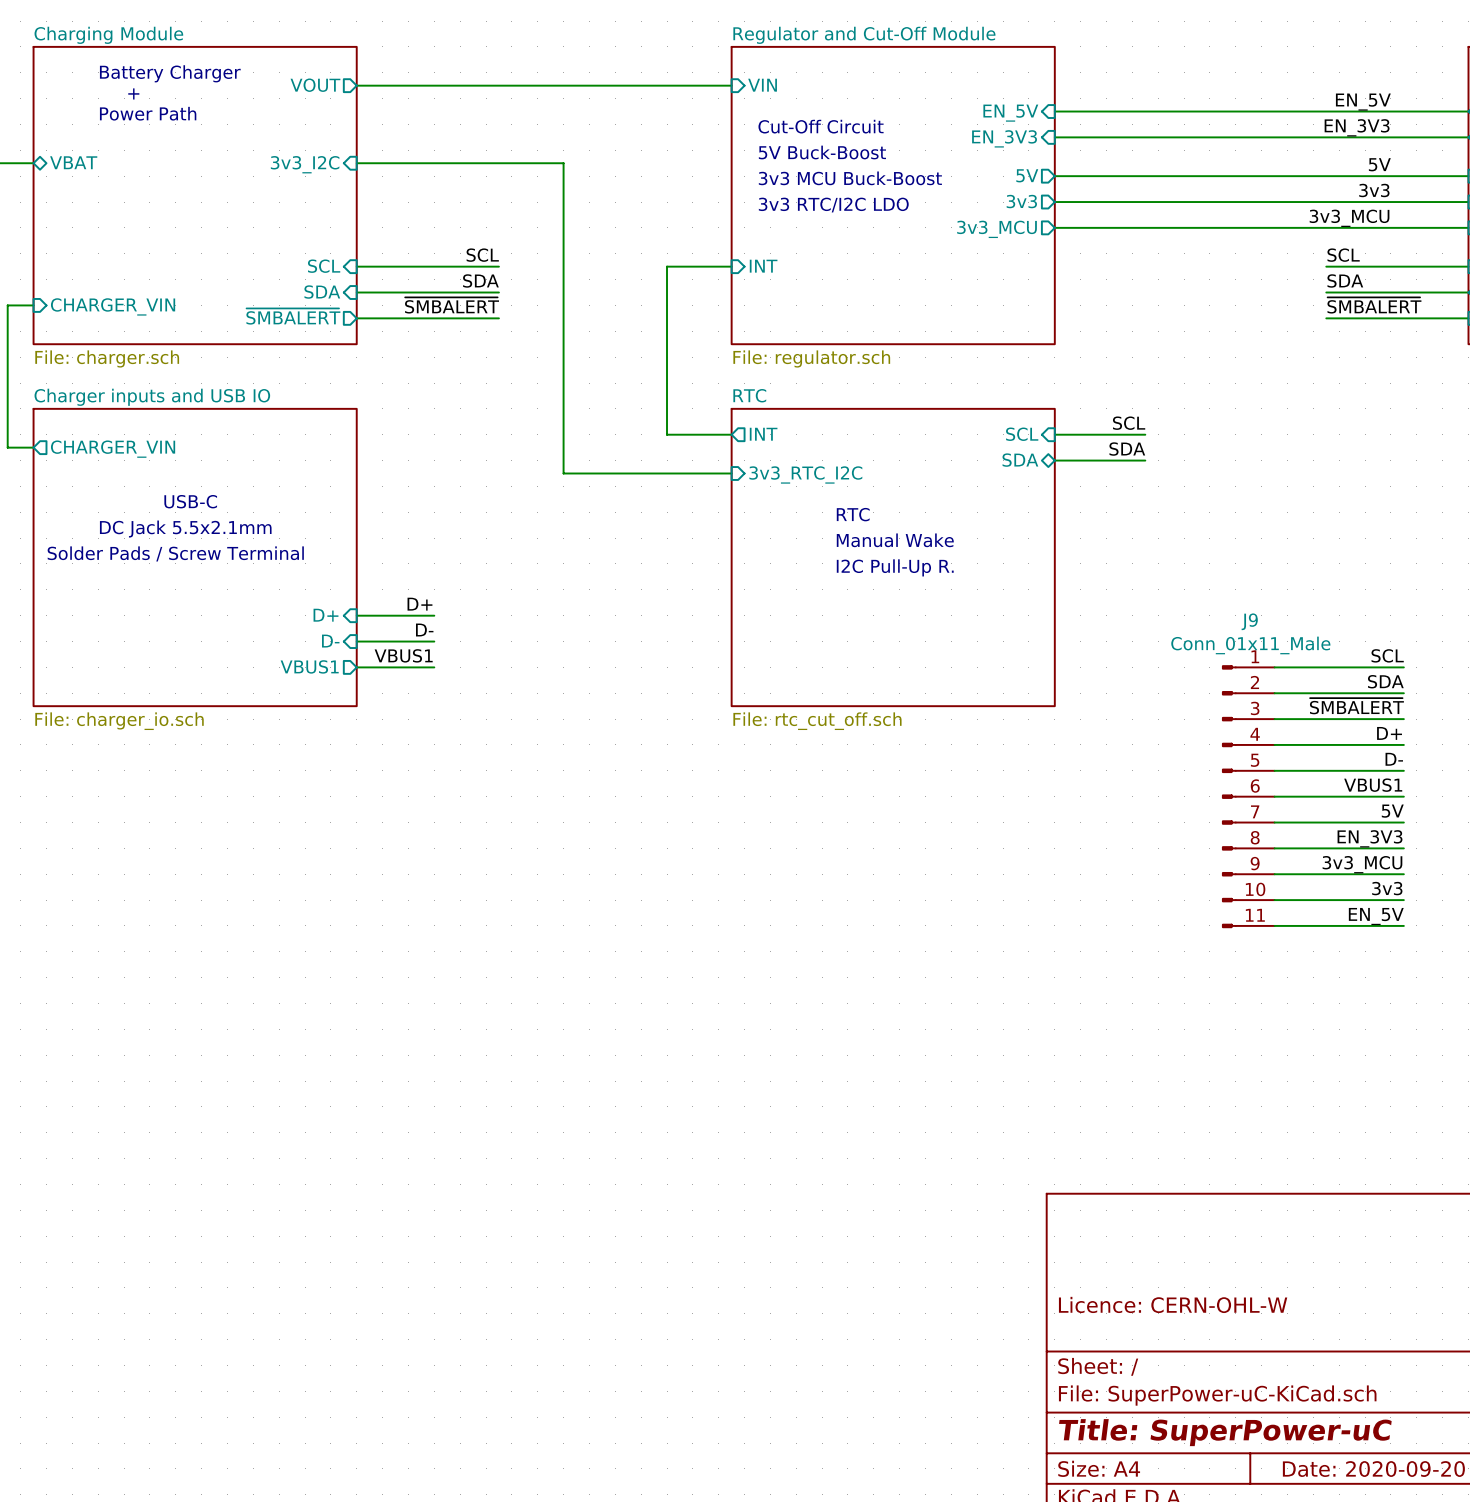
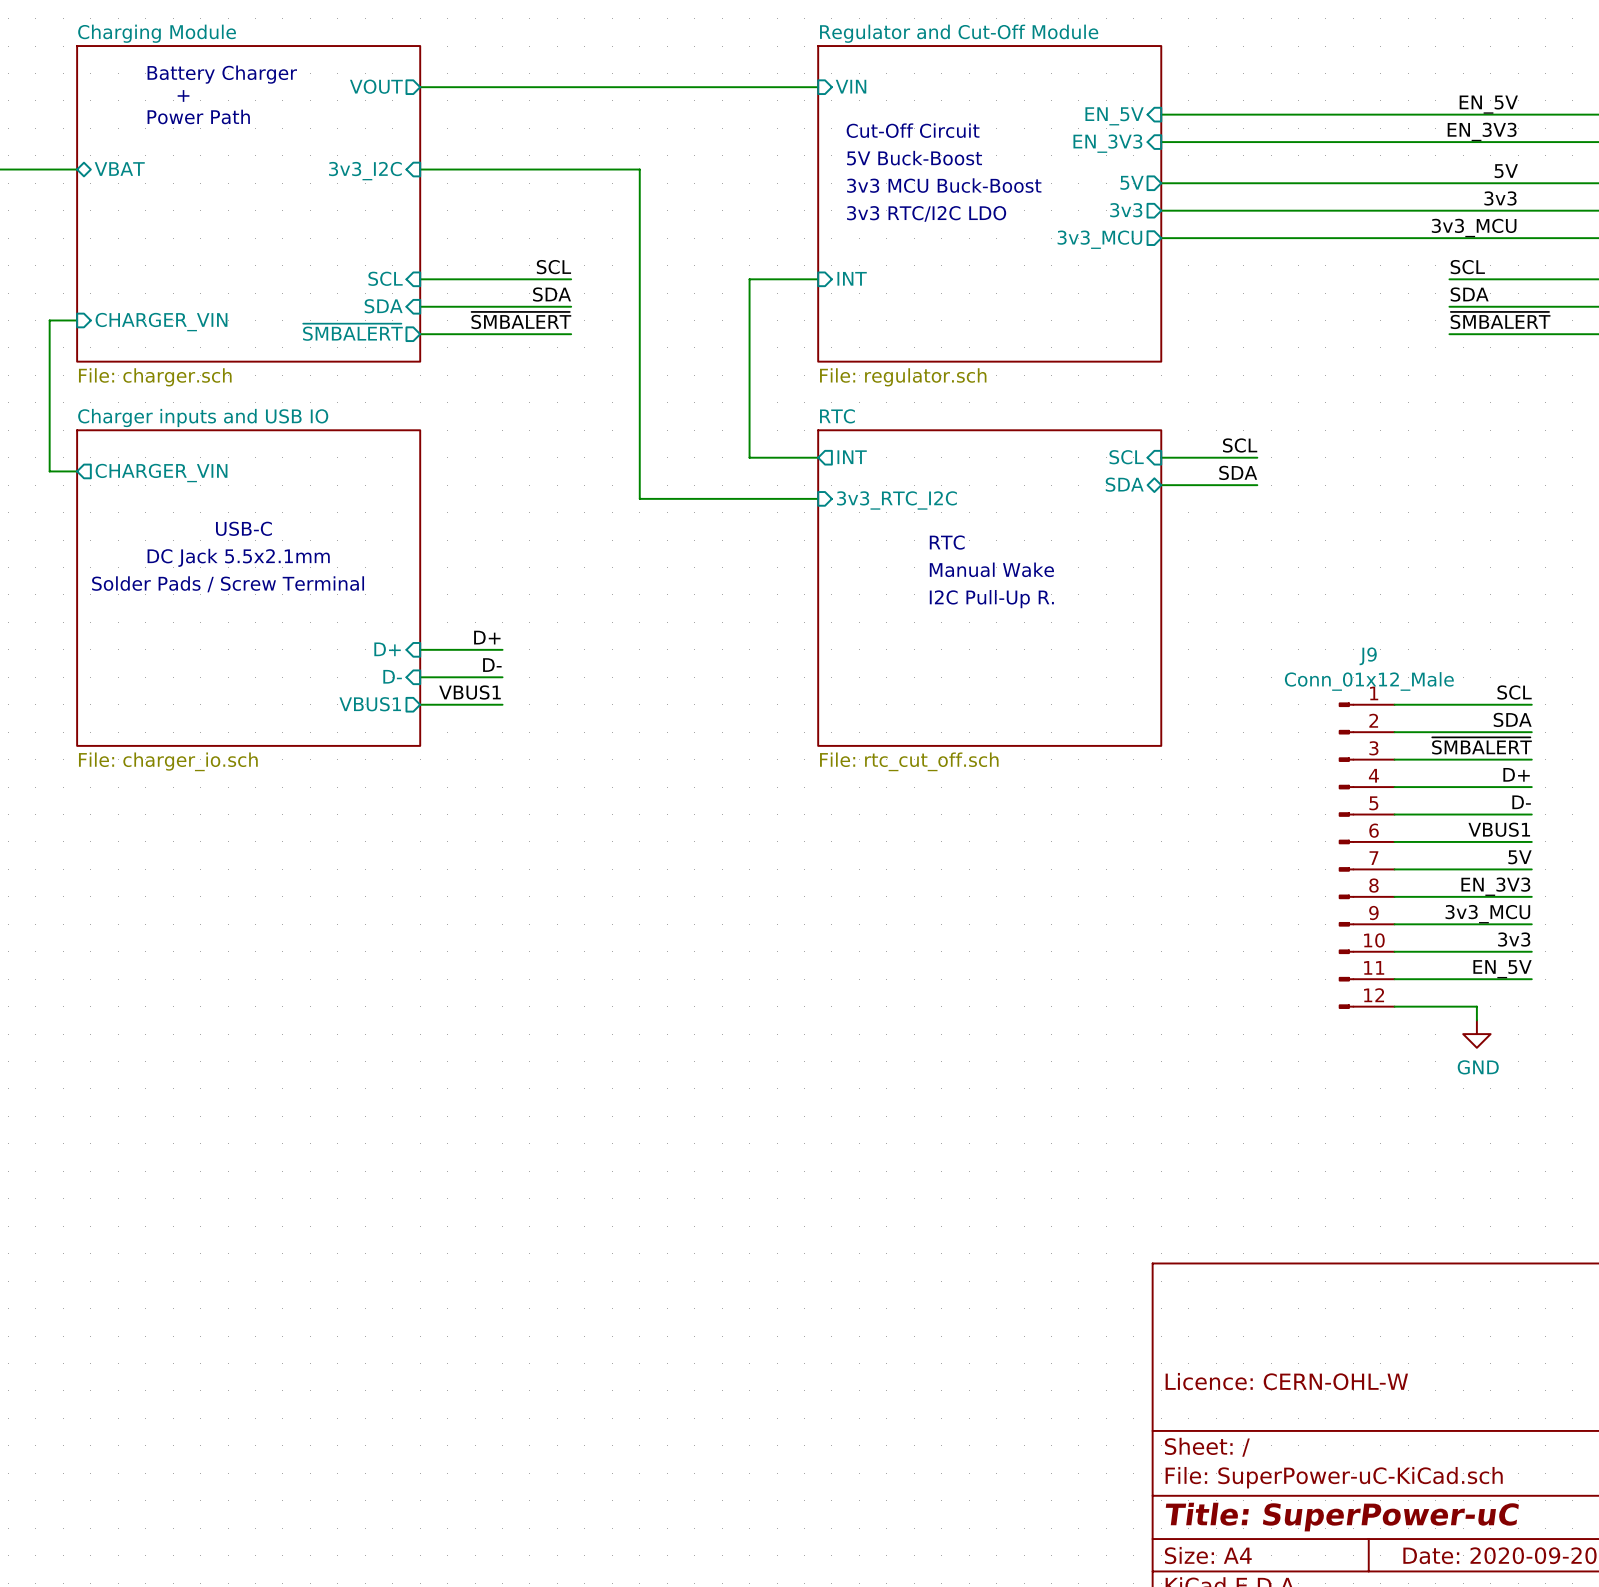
J9 value: Conn_01x11_Male (1250, 645) -> Conn_01x12_Male (1369, 681)
J9 symbol: [1222, 665, 1275, 929] -> [1338, 702, 1395, 1009]
wire: none -> (1394, 1006) (1476, 1006) (1476, 1020)
power symbol: none -> GND (1476, 1034)

